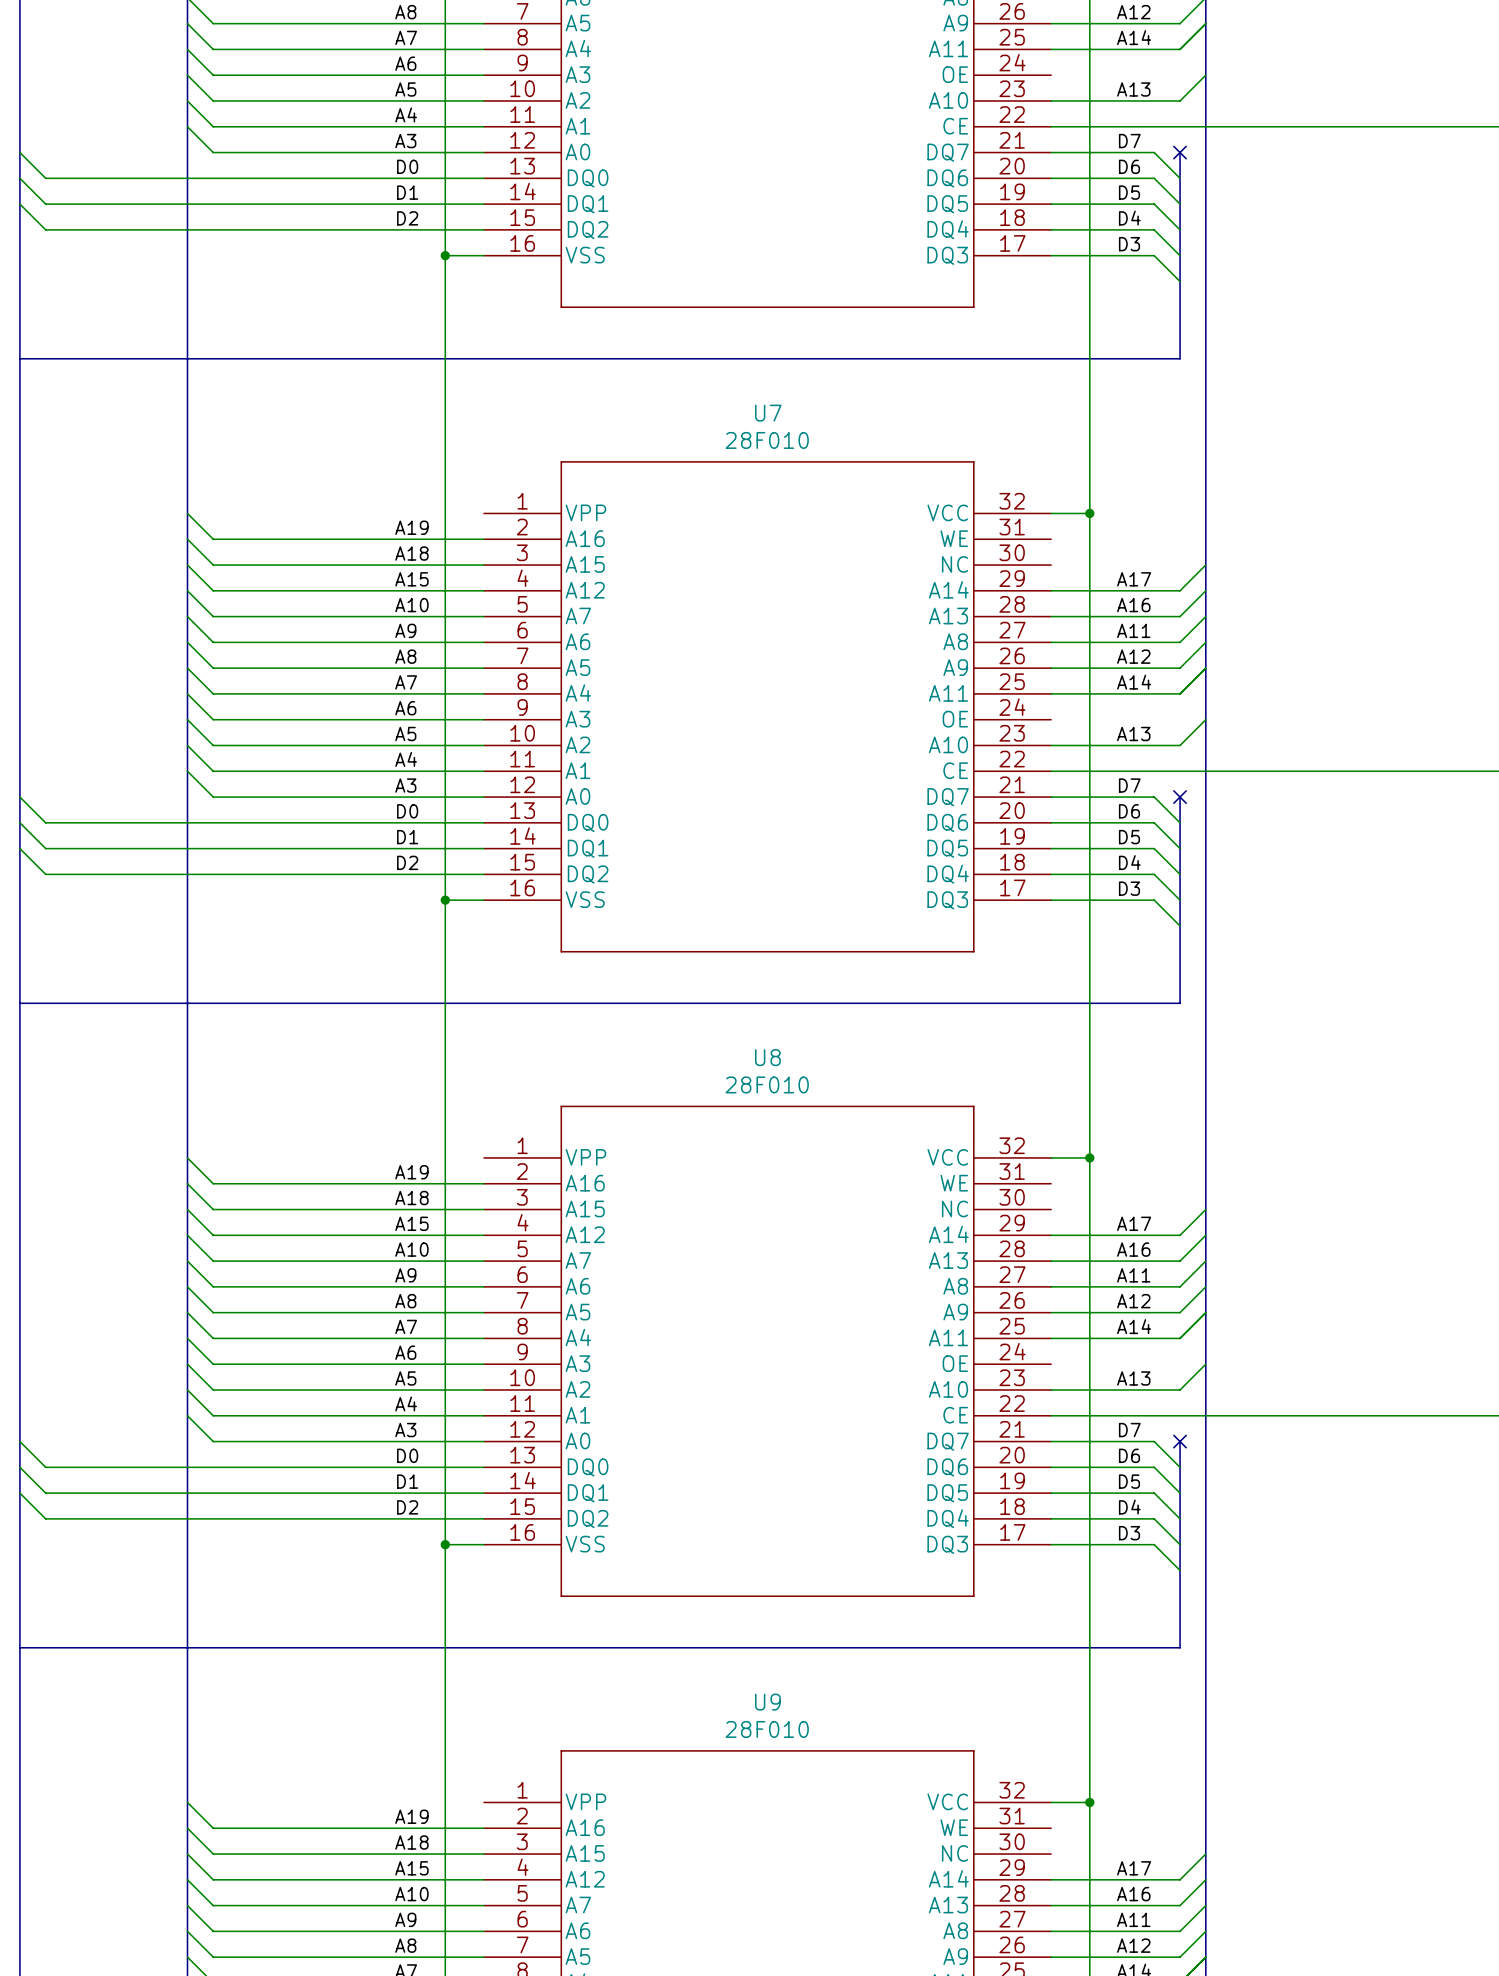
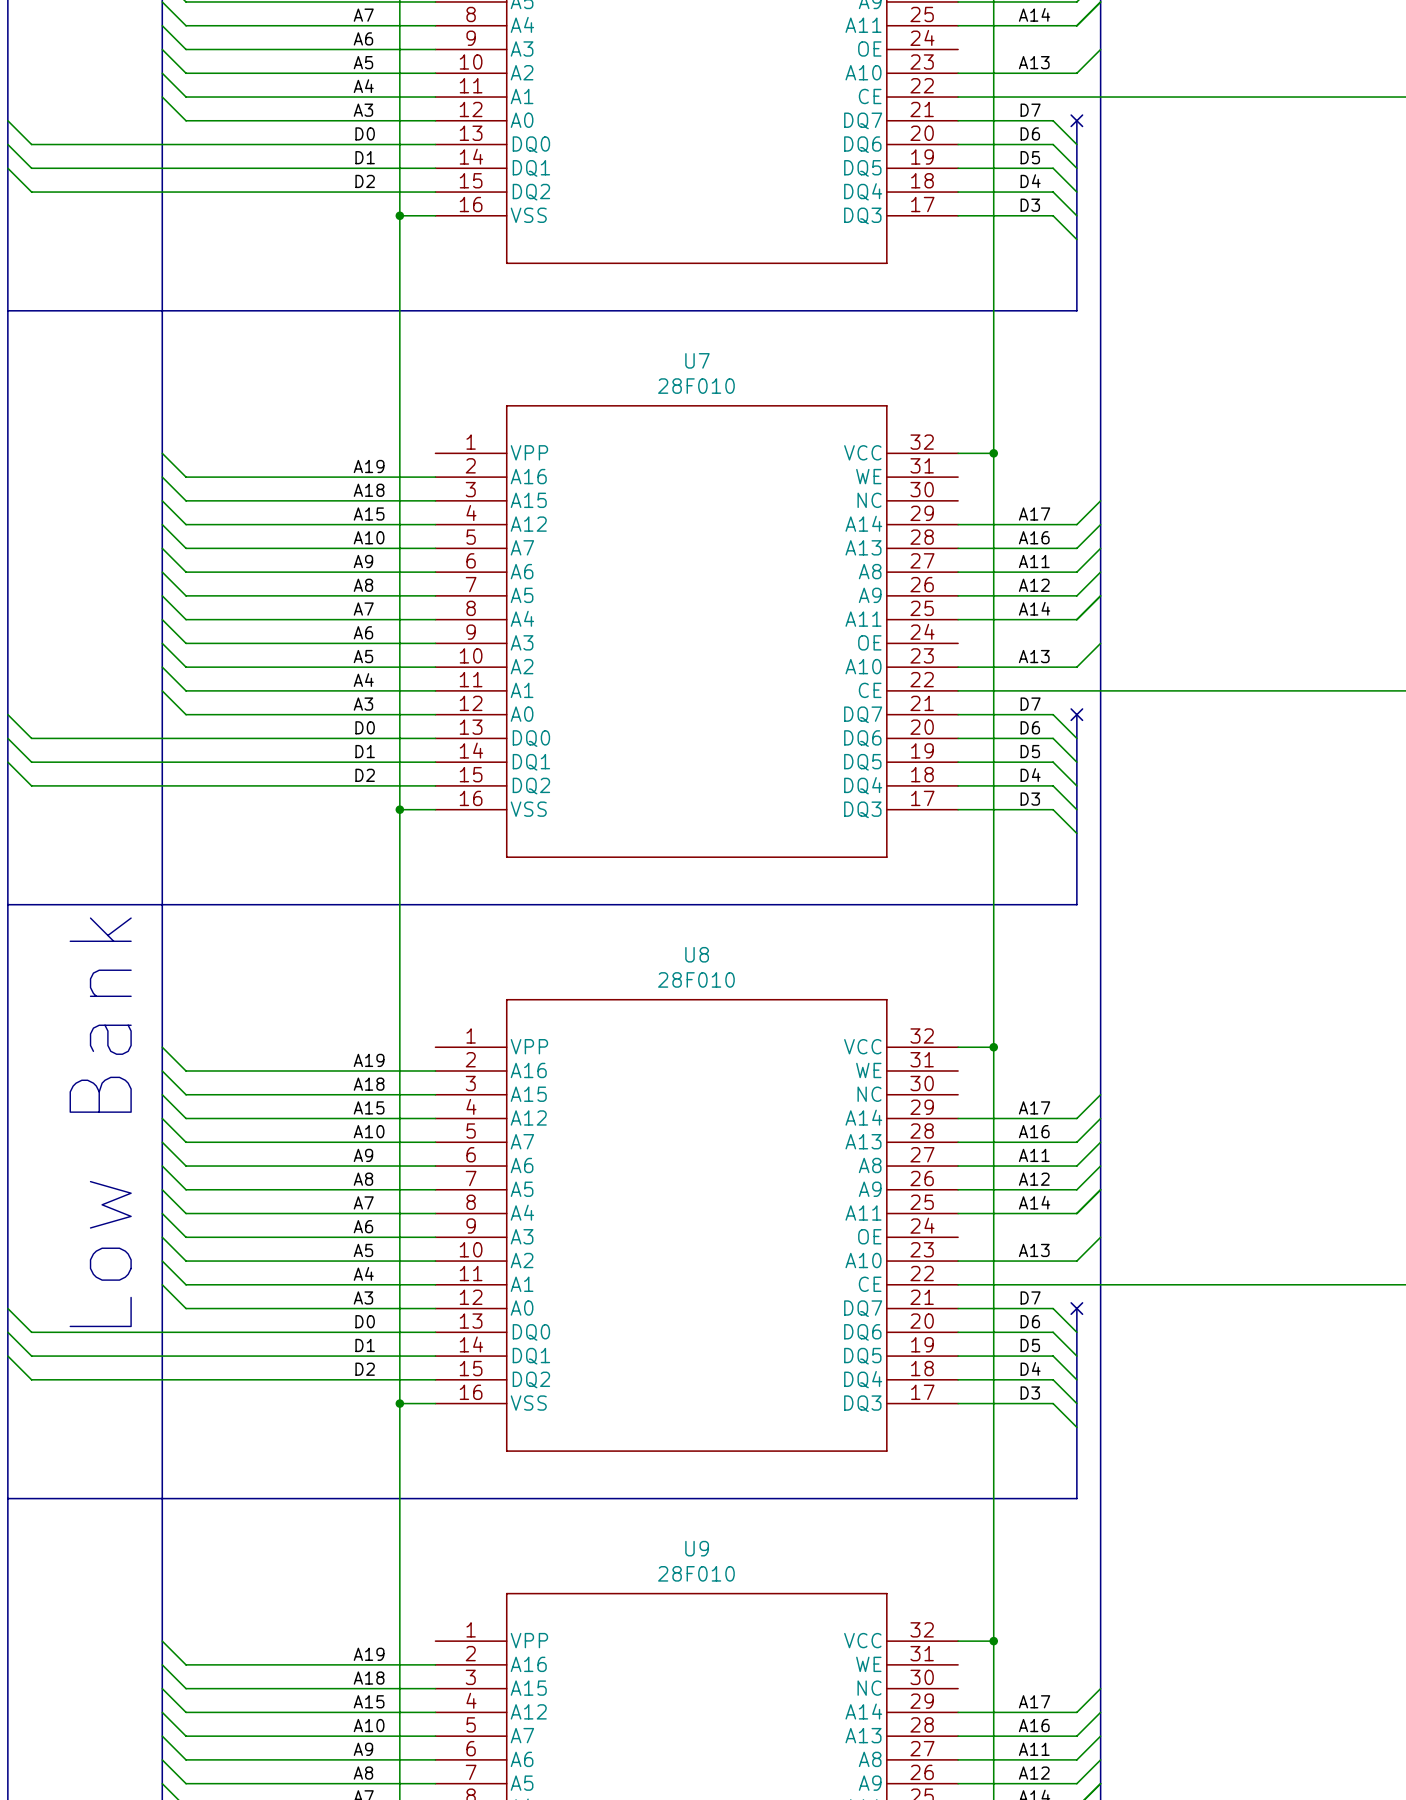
text: none -> Low Bank (100, 1122)

